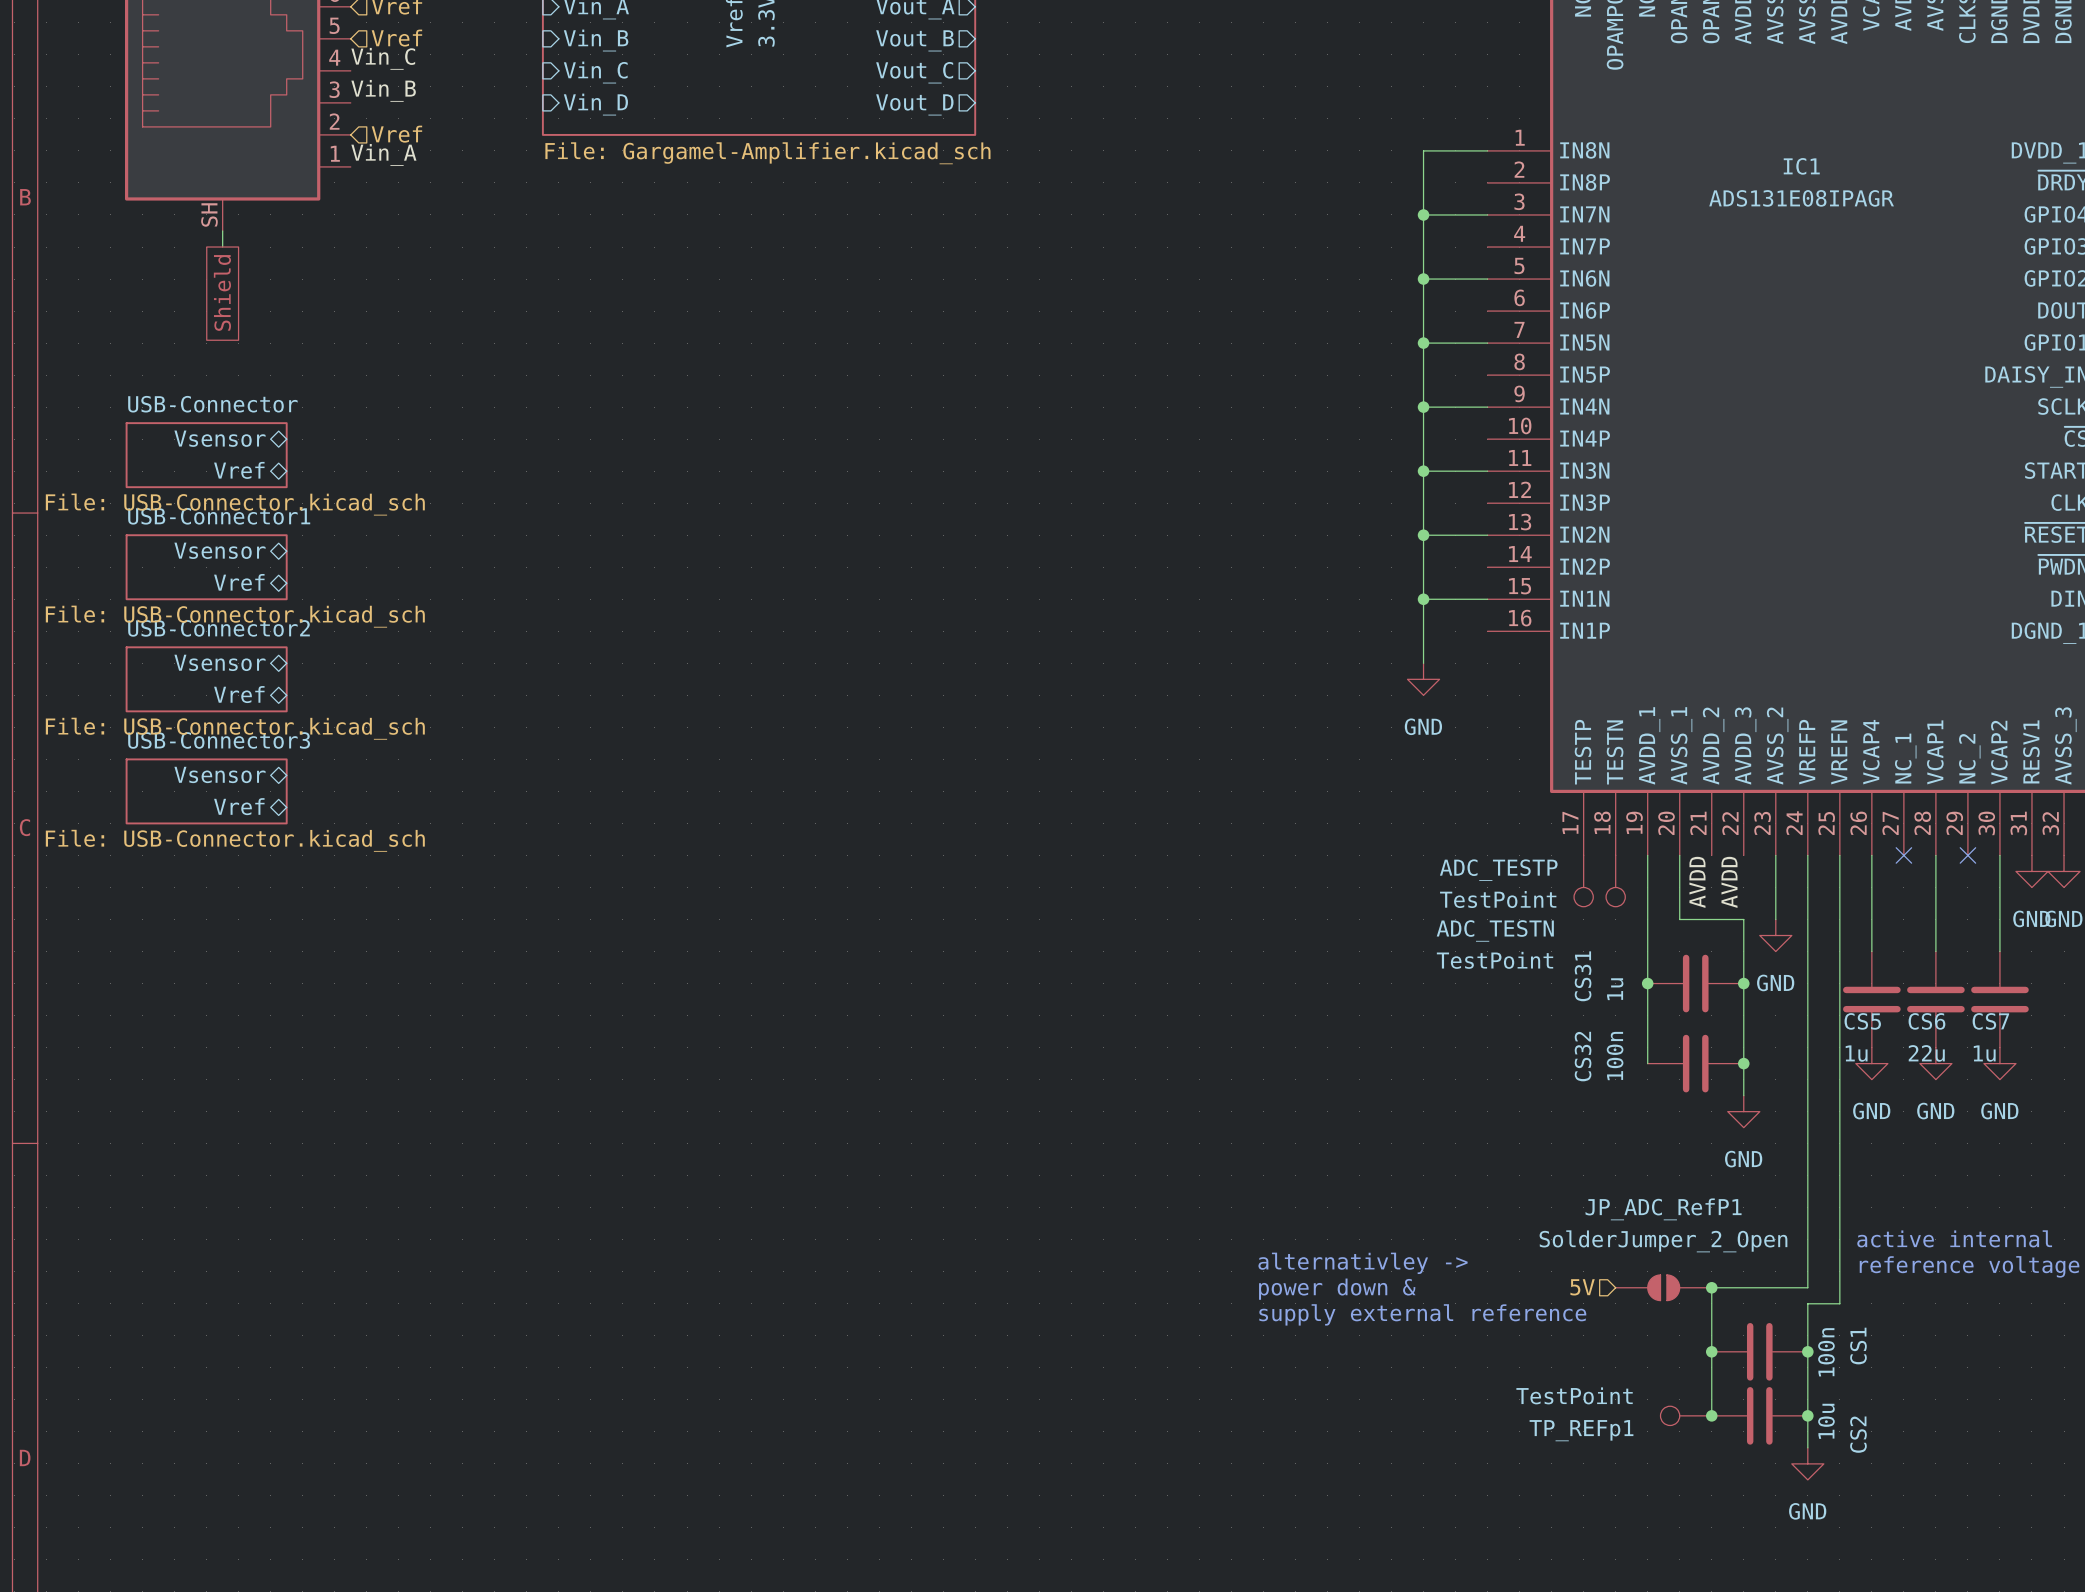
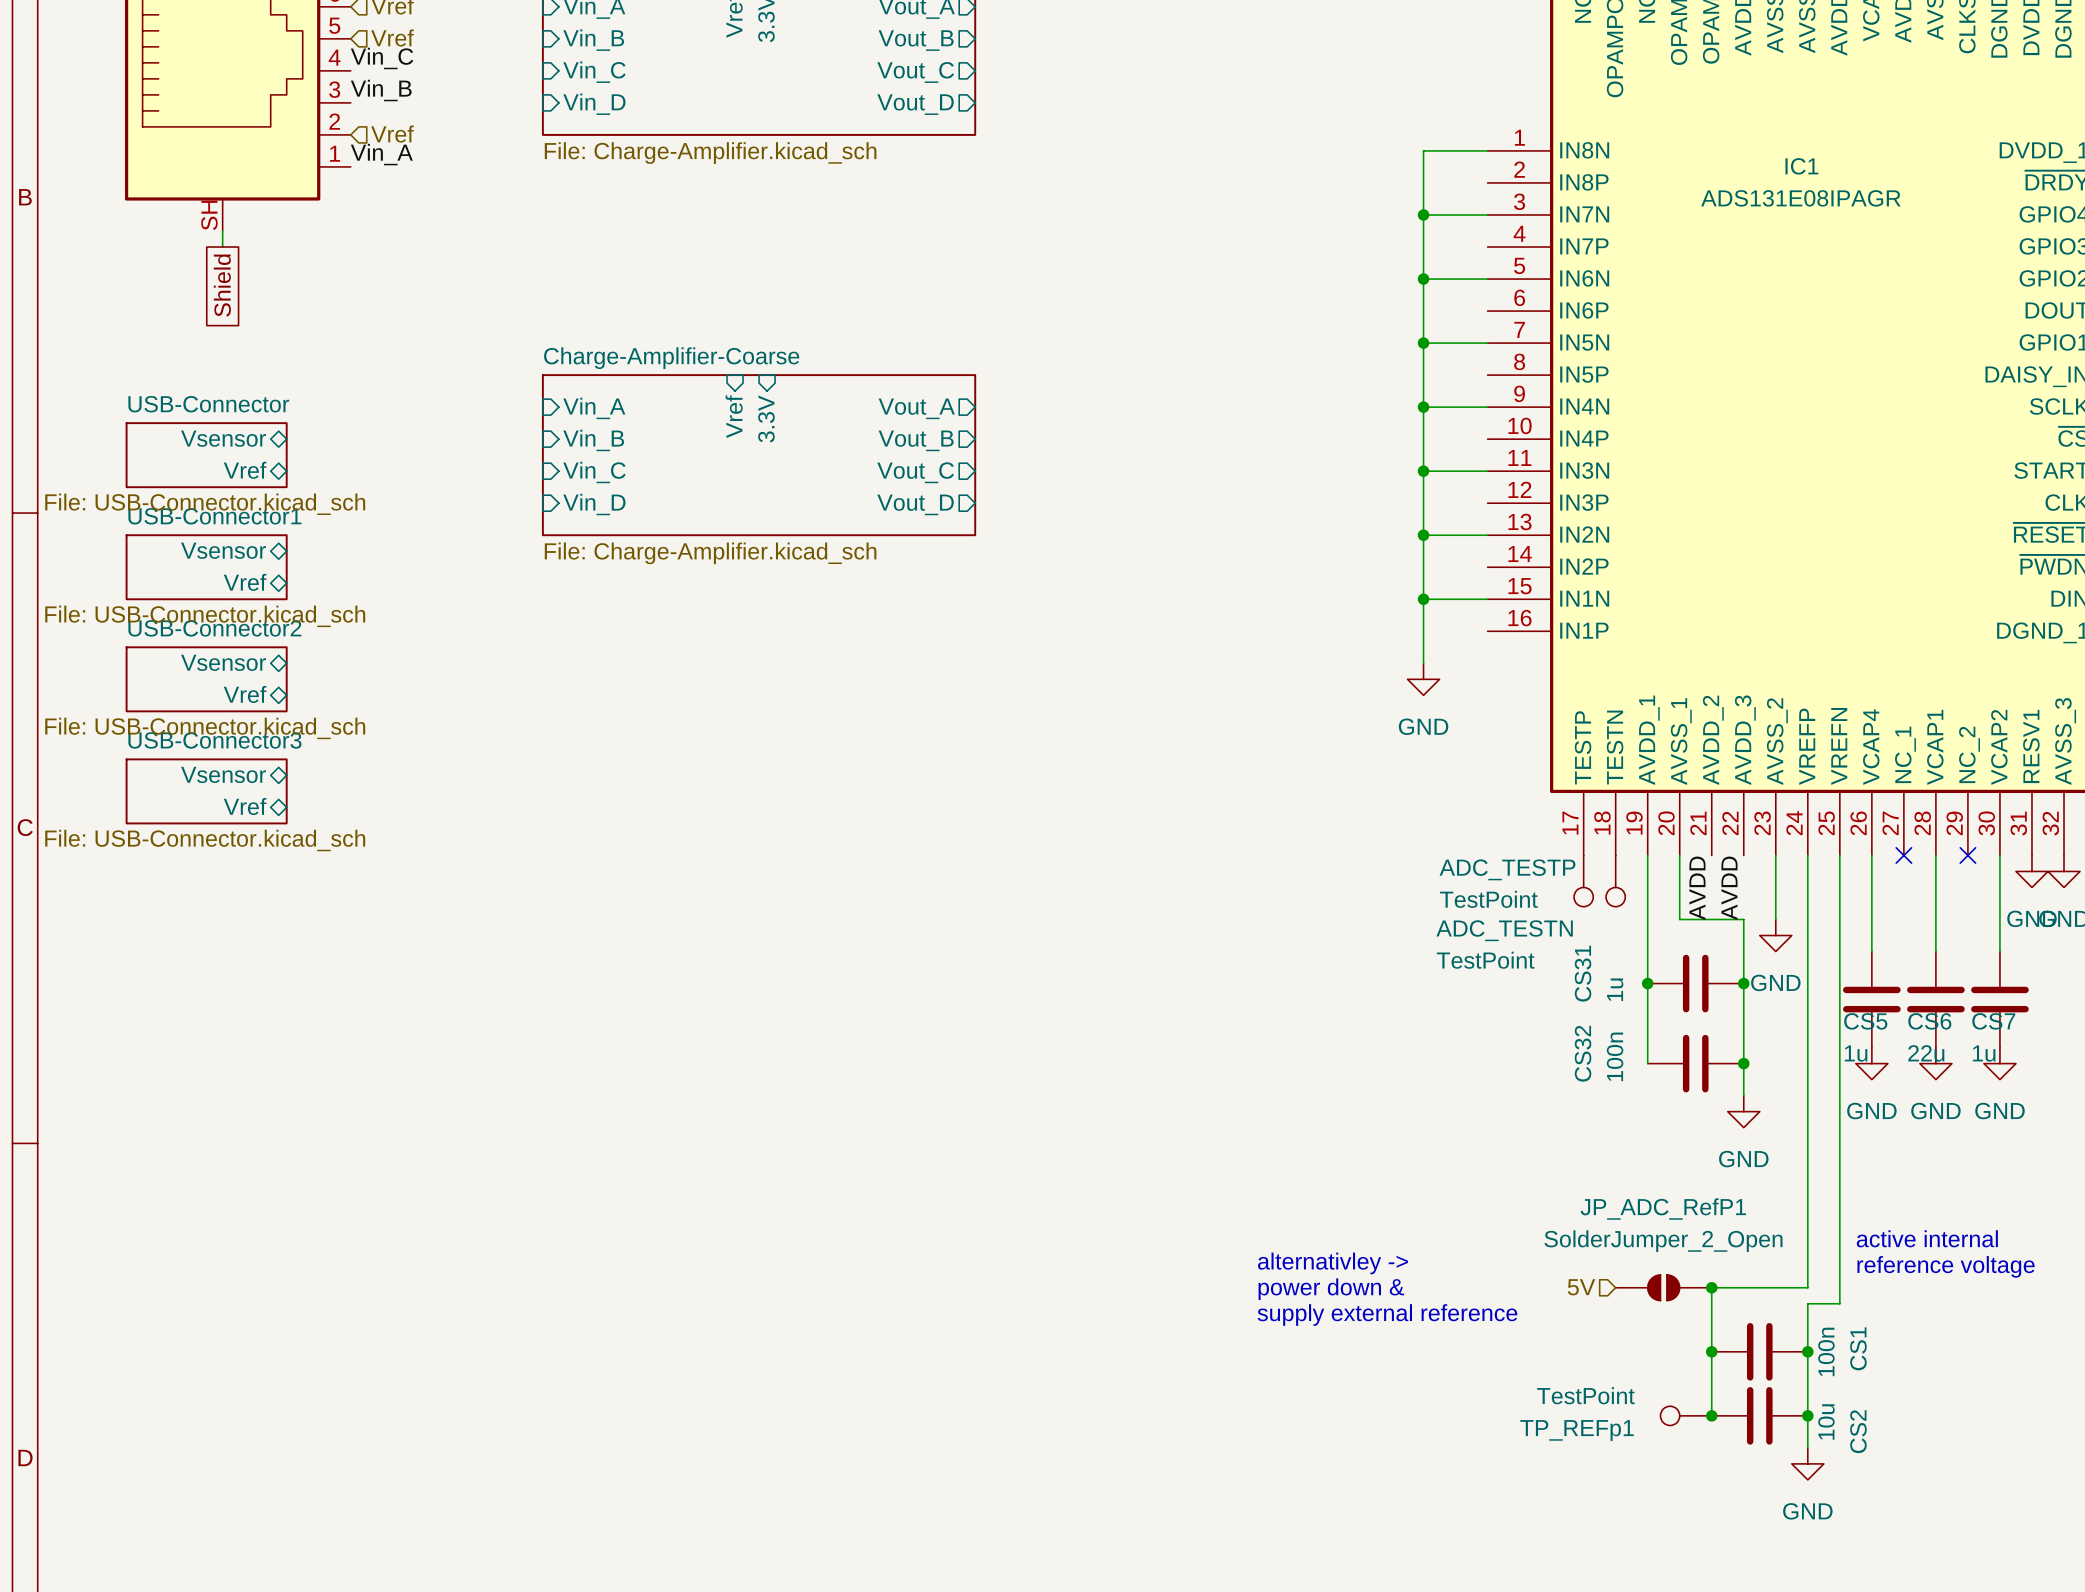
sheet value: File: Gargamel-Amplifier.kicad_sch (767, 153) -> File: Charge-Amplifier.kicad_sch (710, 153)
sheet pin: none -> Vin_A (594, 408)
sheet pin: none -> Vout_A (916, 408)
sheet pin: none -> 3.3V (766, 418)
sheet pin: none -> Vref (734, 416)
sheet pin: none -> Vin_B (593, 440)
sheet pin: none -> Vout_B (916, 440)
sheet Charge-Amplifier-Coarse: none -> File: Charge-Amplifier.kicad_sch (759, 455)
sheet pin: none -> Vin_C (594, 472)
sheet pin: none -> Vout_C (915, 472)
sheet pin: none -> Vin_D (594, 504)
sheet pin: none -> Vout_D (915, 504)

